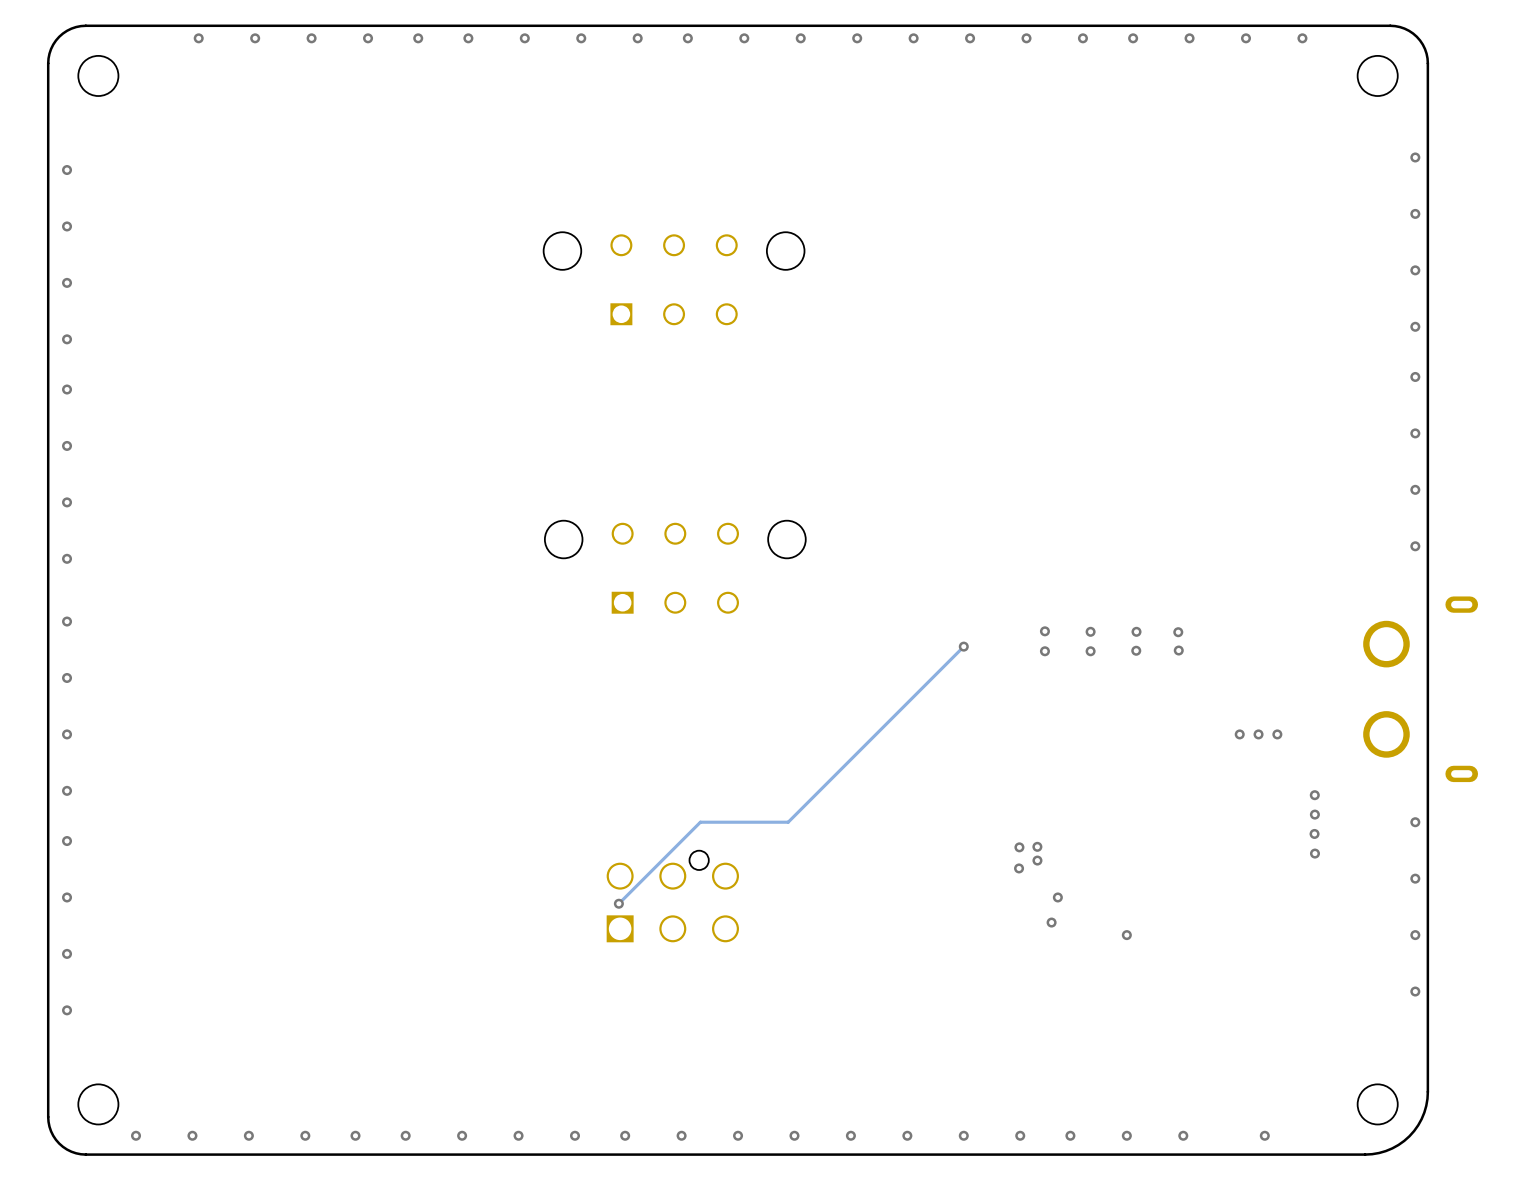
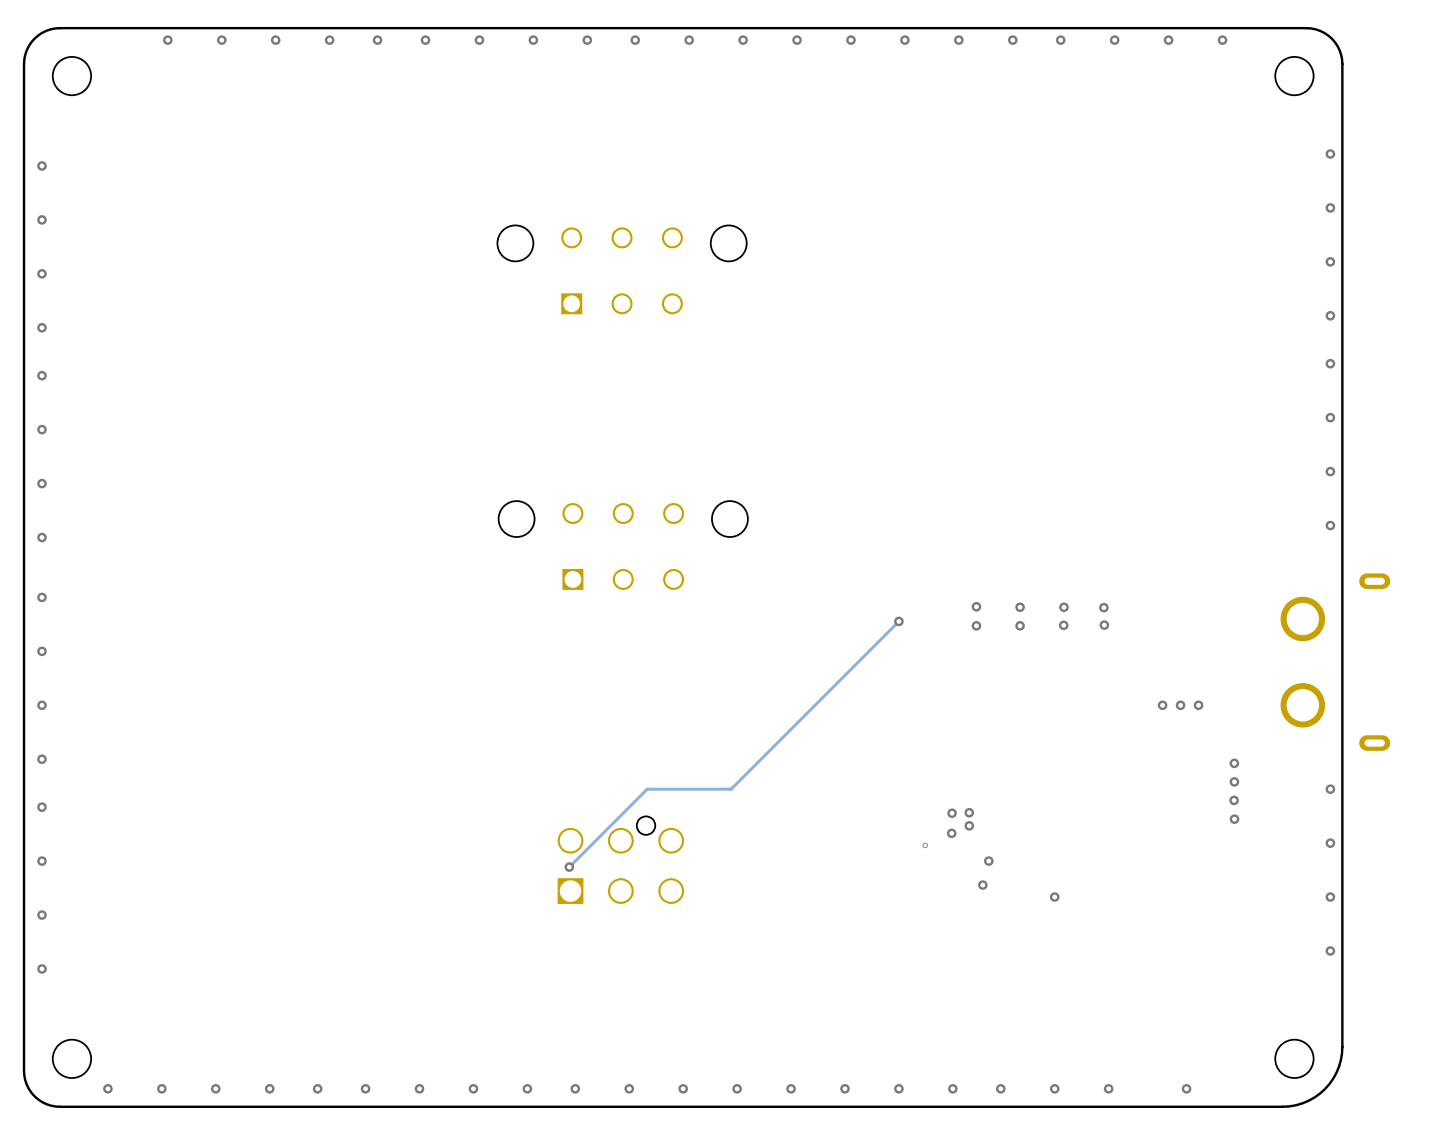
via: none -> (925, 845)

